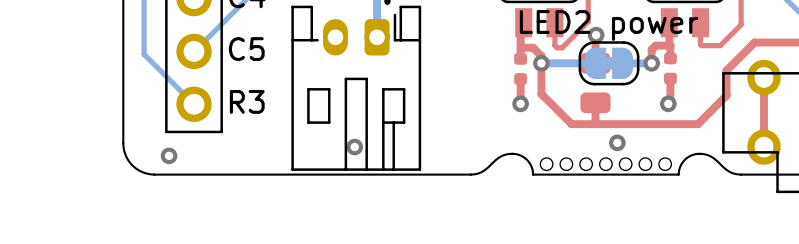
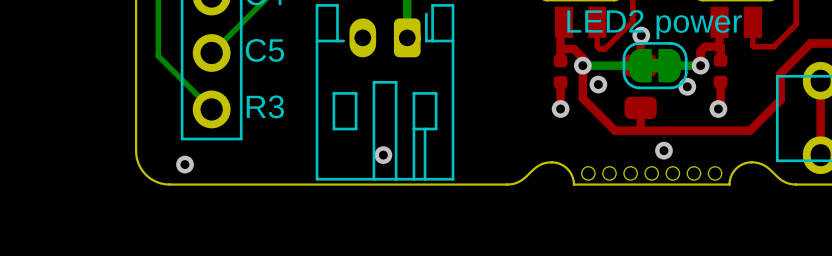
via: none -> (598, 84)
via: none -> (687, 86)

